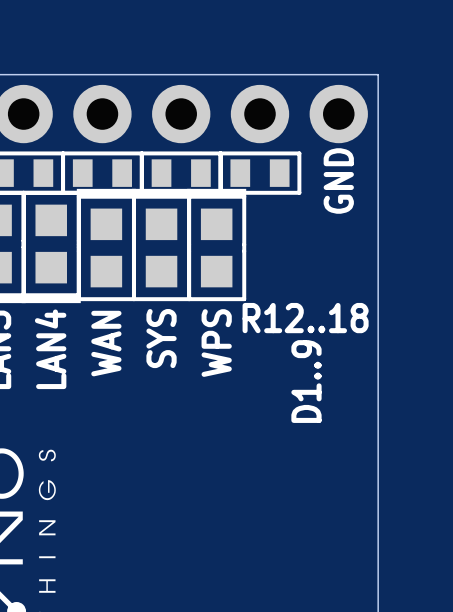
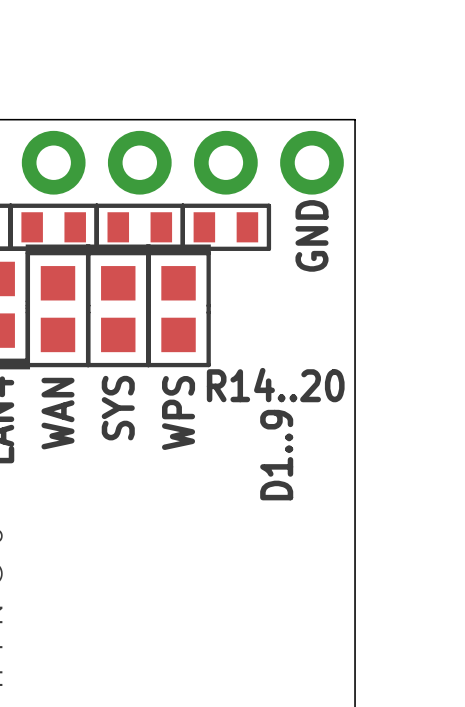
text: R12..18 (305, 318) -> R14..20 (275, 385)

